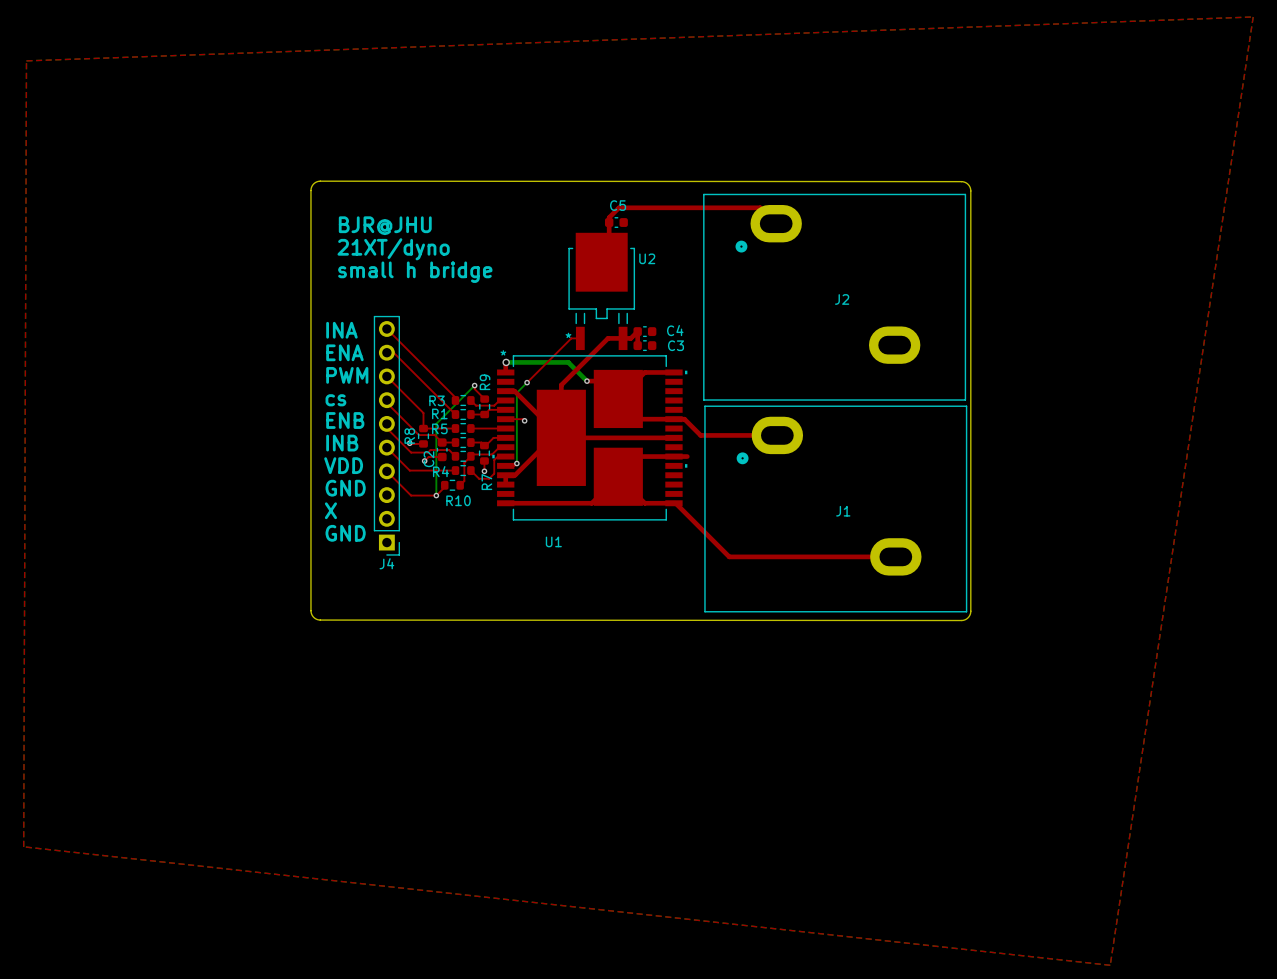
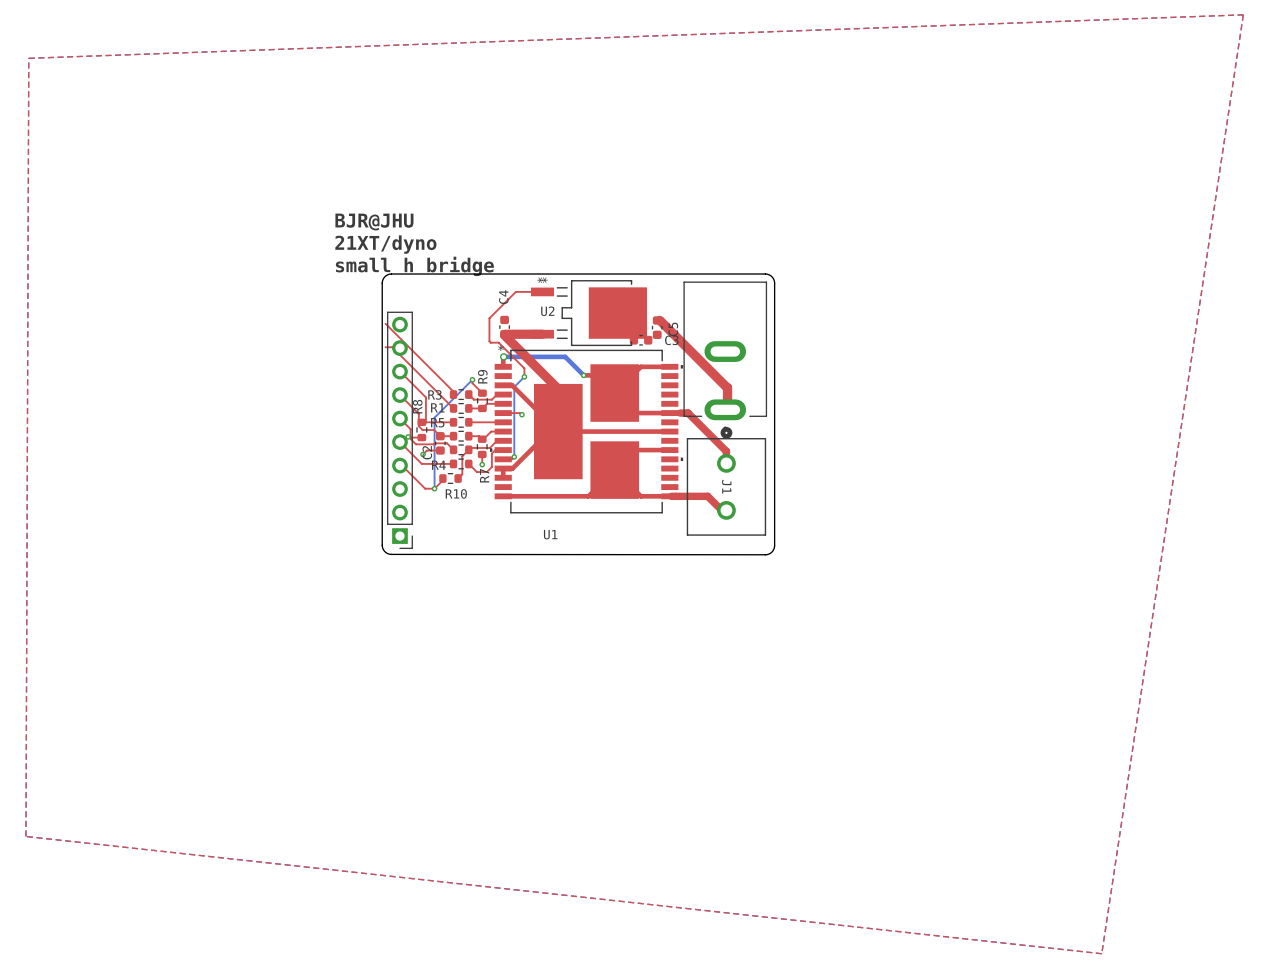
board edge: (320, 181) (961, 181) (967, 183) (970, 190) (969, 616) (961, 620) (320, 620) (314, 618) (310, 610) (310, 190) (313, 183) (320, 181) -> none
top track: (769, 216) (776, 223) (760, 207) (618, 207) (609, 217) (609, 254) (601, 262) -> none
C5 rotation: 0° (616, 222) -> 90° clockwise (657, 327)
C5 position: (616, 222) -> (657, 327)
U2 name position: U2 (647, 258) -> U2 (547, 311)
board edge: none -> (391, 274) (765, 274) (771, 276) (774, 283) (774, 545) (772, 551) (765, 554) (391, 554) (385, 552) (382, 545) (382, 283) (384, 276) (391, 274)
U2 rotation: 0° (601, 291) -> 90° clockwise (589, 313)
J2: (834, 297) -> none
top track: none -> (659, 320) (727, 387) (727, 407) (725, 409)
text: INA (341, 330) -> none
C4 name position: C4 (675, 330) -> C4 (503, 297)
C4 rotation: 0° (644, 331) -> 90° clockwise (504, 327)
C4 position: (644, 331) -> (504, 327)
top track: (580, 338) (571, 338) (527, 382) -> (542, 291) (515, 291) (489, 318) (489, 341) (498, 342) (524, 368) (524, 376)
top track: (637, 345) (637, 331) (630, 338) (608, 338) (561, 385) (561, 394) -> (542, 334) (504, 335) (558, 389)
text: ENA (344, 352) -> none
part: none -> (725, 355)
text: PWM (347, 375) -> none
top track: (386, 376) (423, 413) (423, 428) (427, 428) -> (399, 370) (425, 397) (425, 422)
text: cs (335, 400) -> none
top track: (386, 400) (386, 403) (418, 435) (435, 436) -> (399, 395) (418, 413) (418, 426) (422, 430) (434, 430)
J1 footprint: [704, 405, 968, 613] -> [686, 426, 767, 536]
top track: (684, 419) (700, 435) (777, 435) -> (680, 413) (688, 413) (726, 451) (726, 463)
text: ENB (345, 420) -> none
top track: (386, 423) (386, 428) (411, 452) (449, 450) -> (399, 418) (410, 429) (410, 438) (415, 444) (447, 443)
J4: (386, 435) -> none
part: none -> (399, 430)
R8 name position: R8 (409, 436) -> R8 (417, 406)
text: INB (342, 443) -> none
top track: (386, 447) (409, 470) (423, 470) -> (399, 442) (421, 463)
top track: (673, 456) (687, 456) -> none
text: VDD (343, 465) -> none
top track: (386, 471) (411, 495) (426, 495) -> (399, 465) (425, 488)
text: GND (345, 488) -> none
top track: (675, 503) (729, 556) (895, 556) -> (671, 496) (707, 496) (721, 510) (726, 510)
text: X (330, 510) -> none
text: GND (345, 533) -> none

